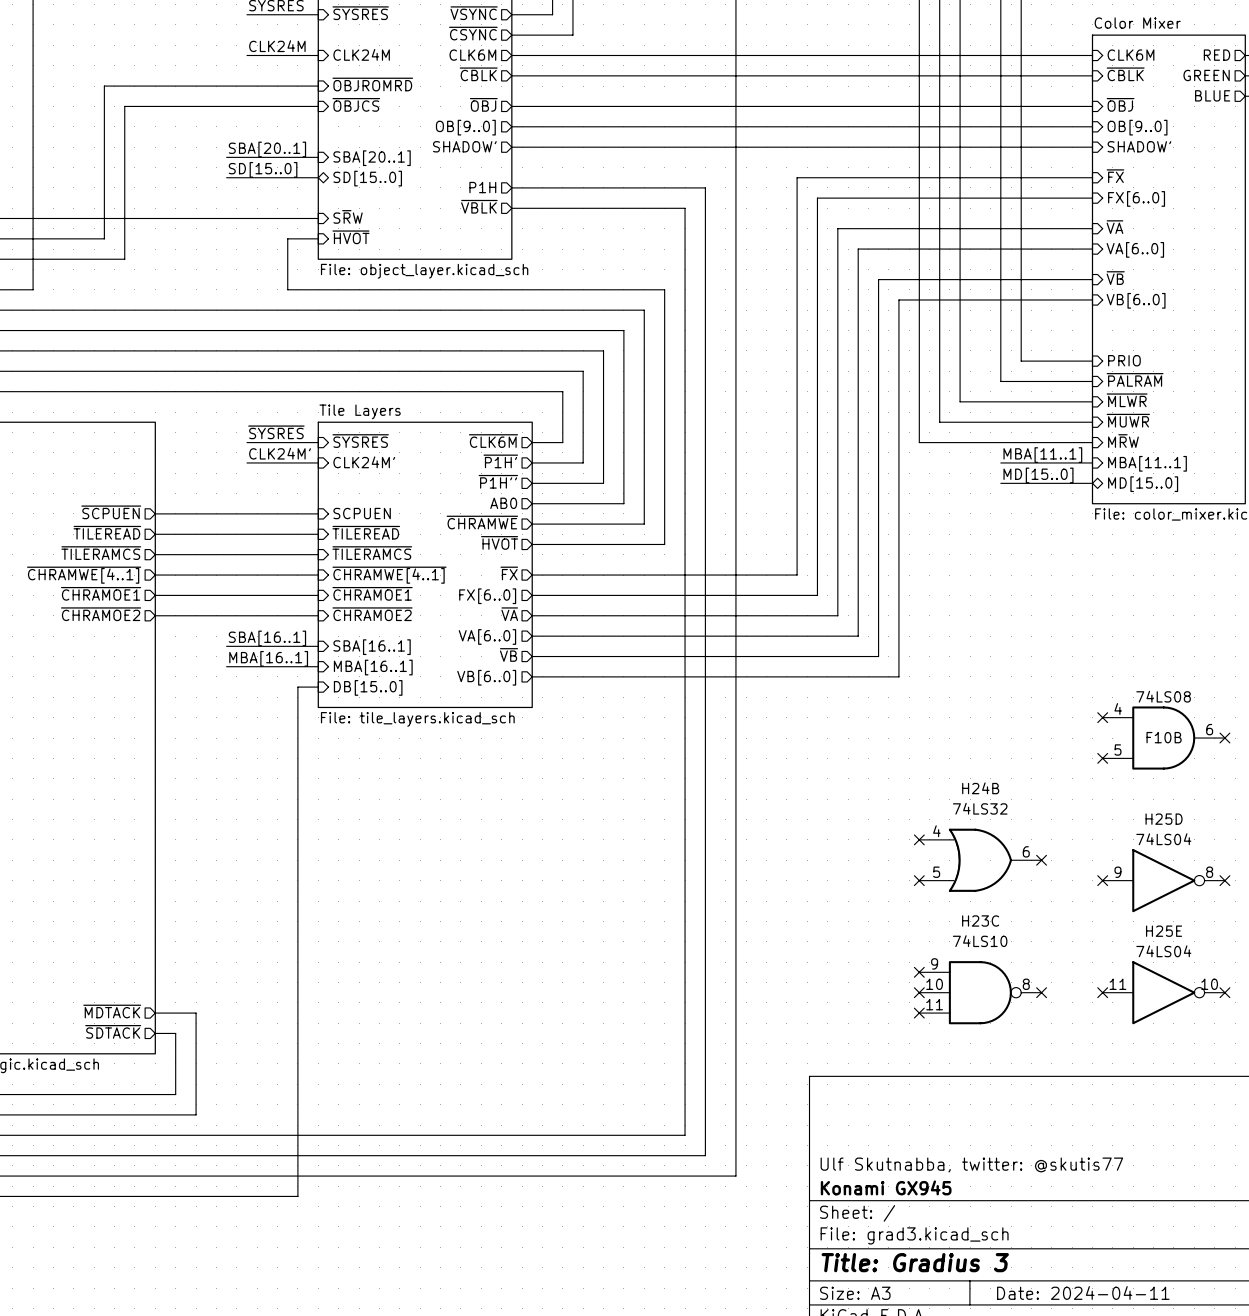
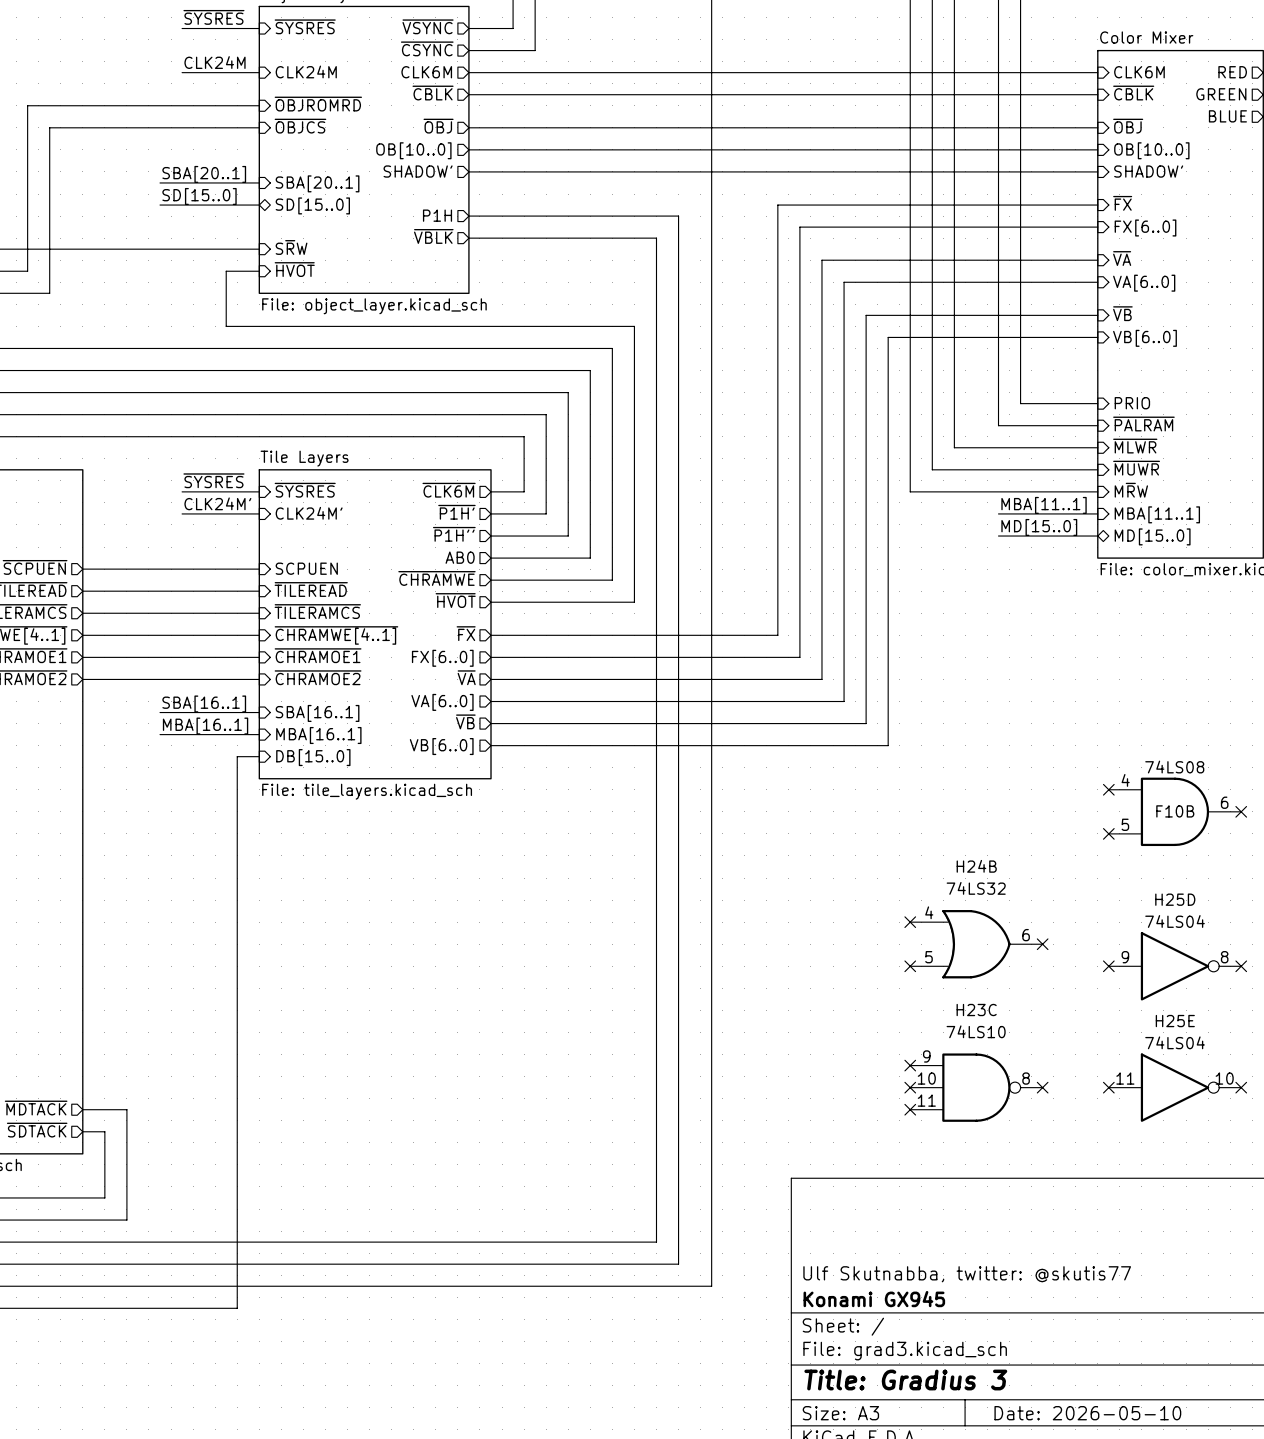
sheet pin: OB[9..0] (465, 127) -> OB[10..0] (413, 150)
sheet pin: OB[9..0] (1137, 127) -> OB[10..0] (1151, 150)
title block: Date: 2024-04-11 (1083, 1292) -> Date: 2026-05-10 (1087, 1413)

